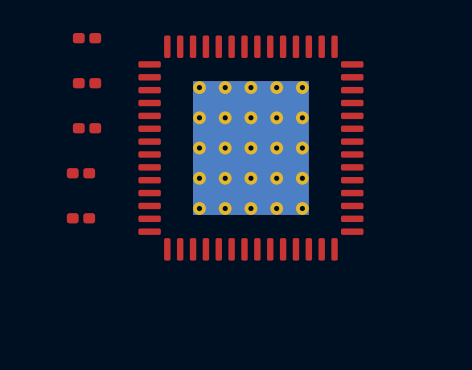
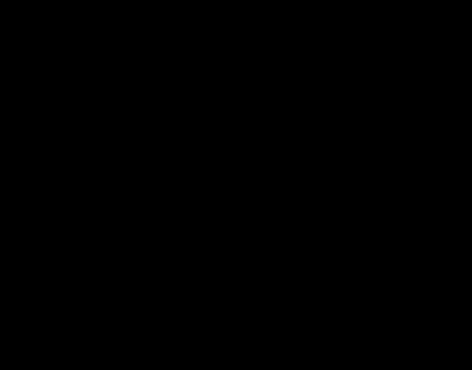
part: (87, 38) -> none
part: (87, 83) -> none
part: (87, 128) -> none
part: (250, 148) -> none
part: (80, 173) -> none
part: (80, 218) -> none

